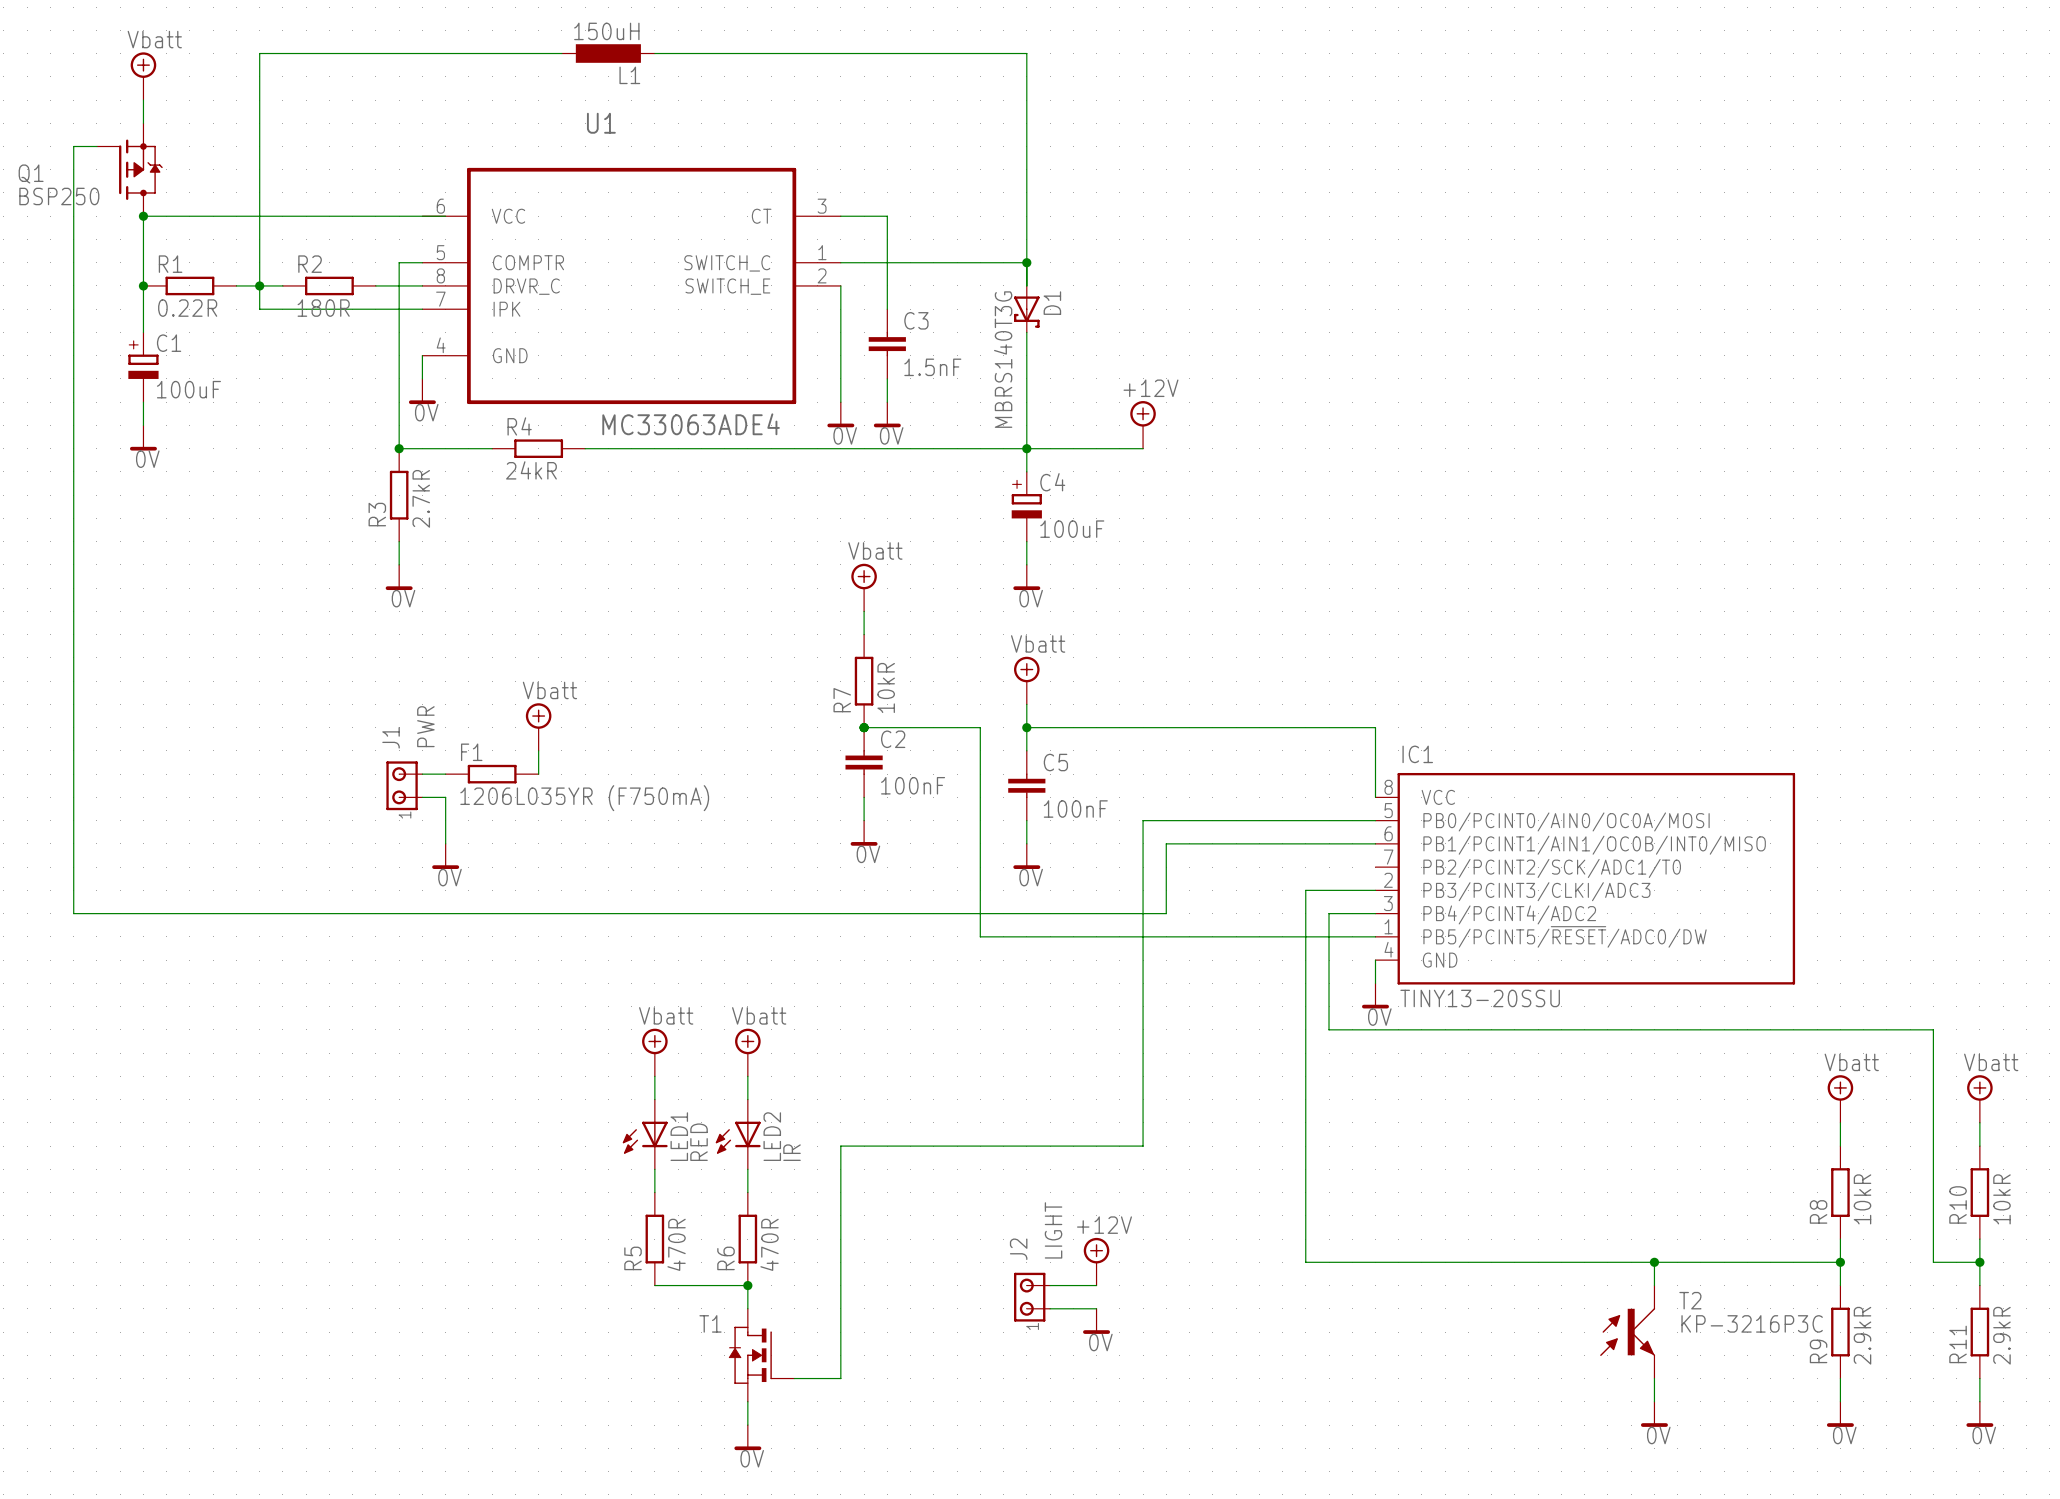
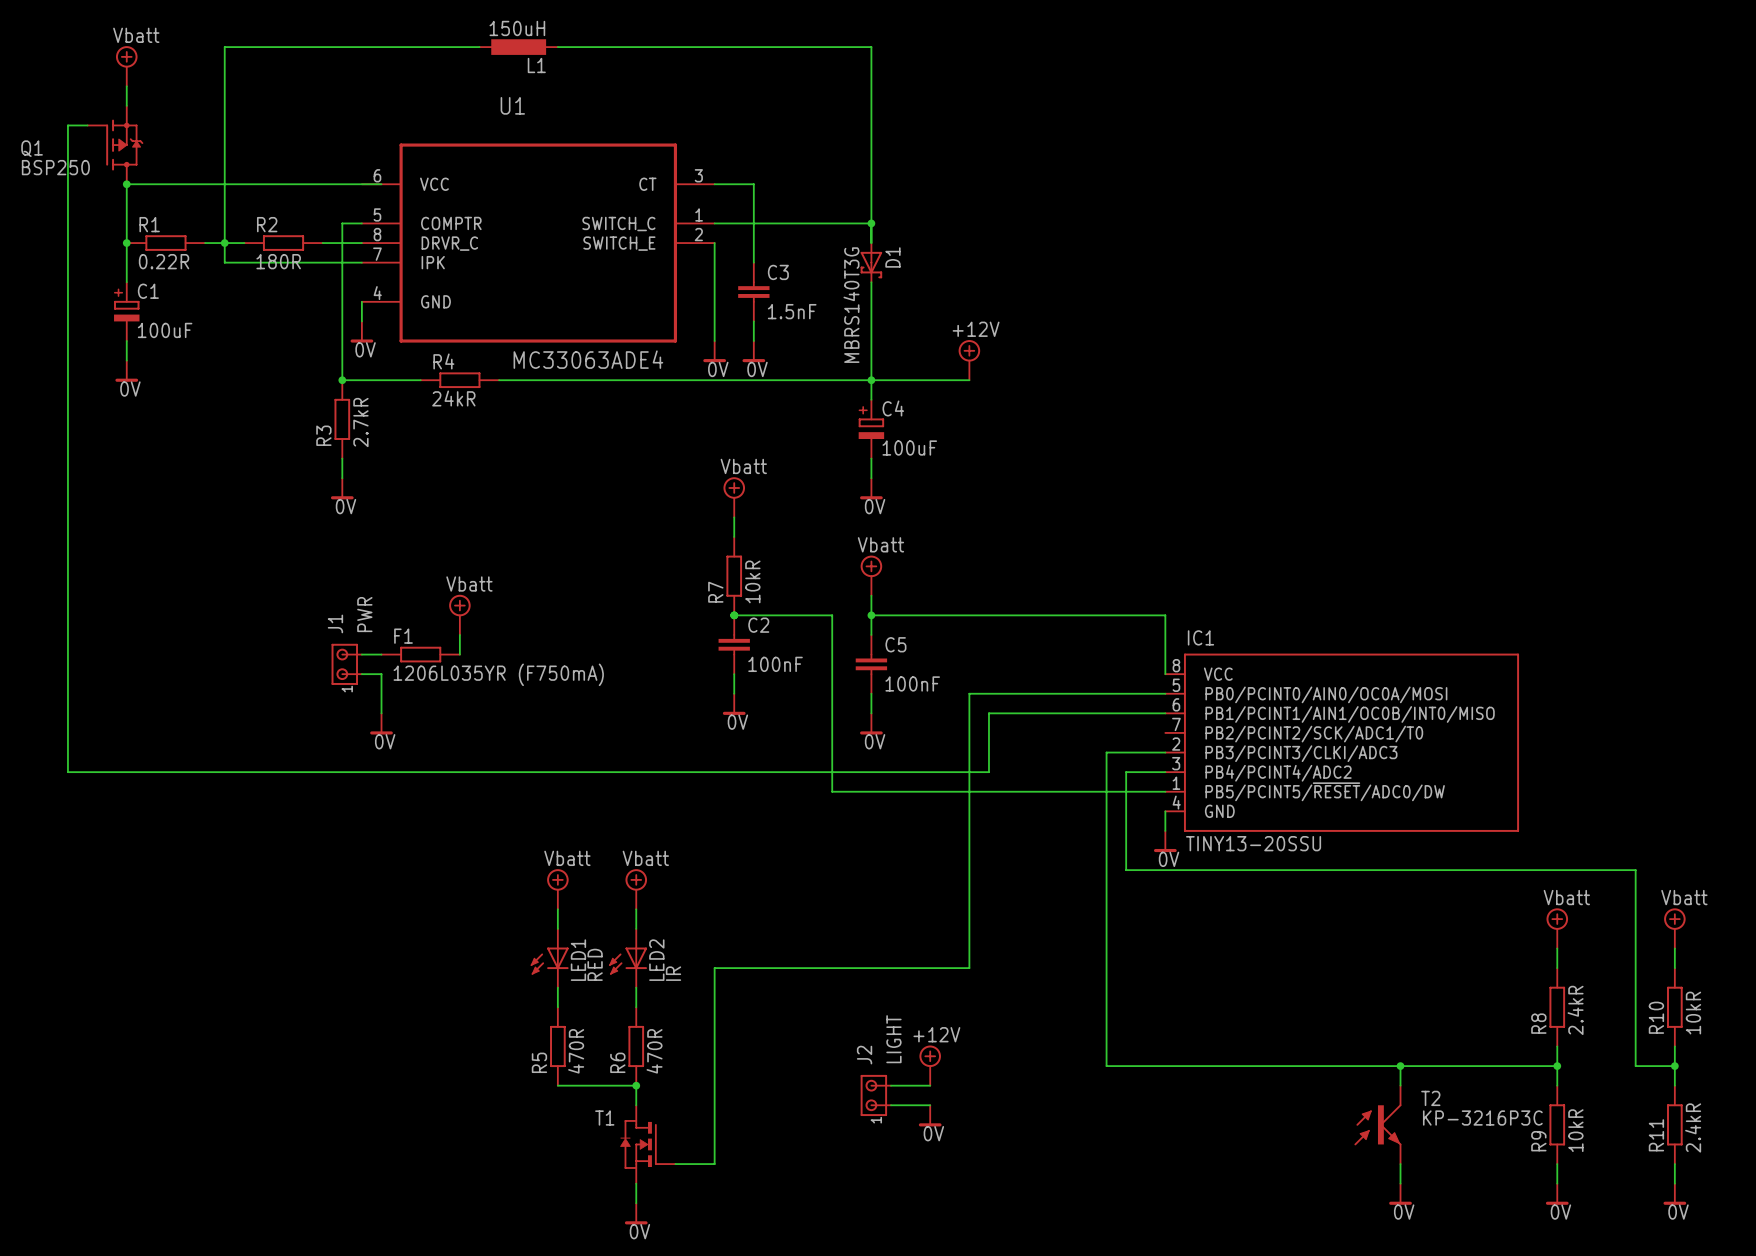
R8 value: 10kR (1862, 1199) -> 2.4kR (1575, 1010)
R9 value: 2.9kR (1862, 1335) -> 10kR (1575, 1130)
R11 value: 2.9kR (2001, 1335) -> 2.4kR (1693, 1127)

